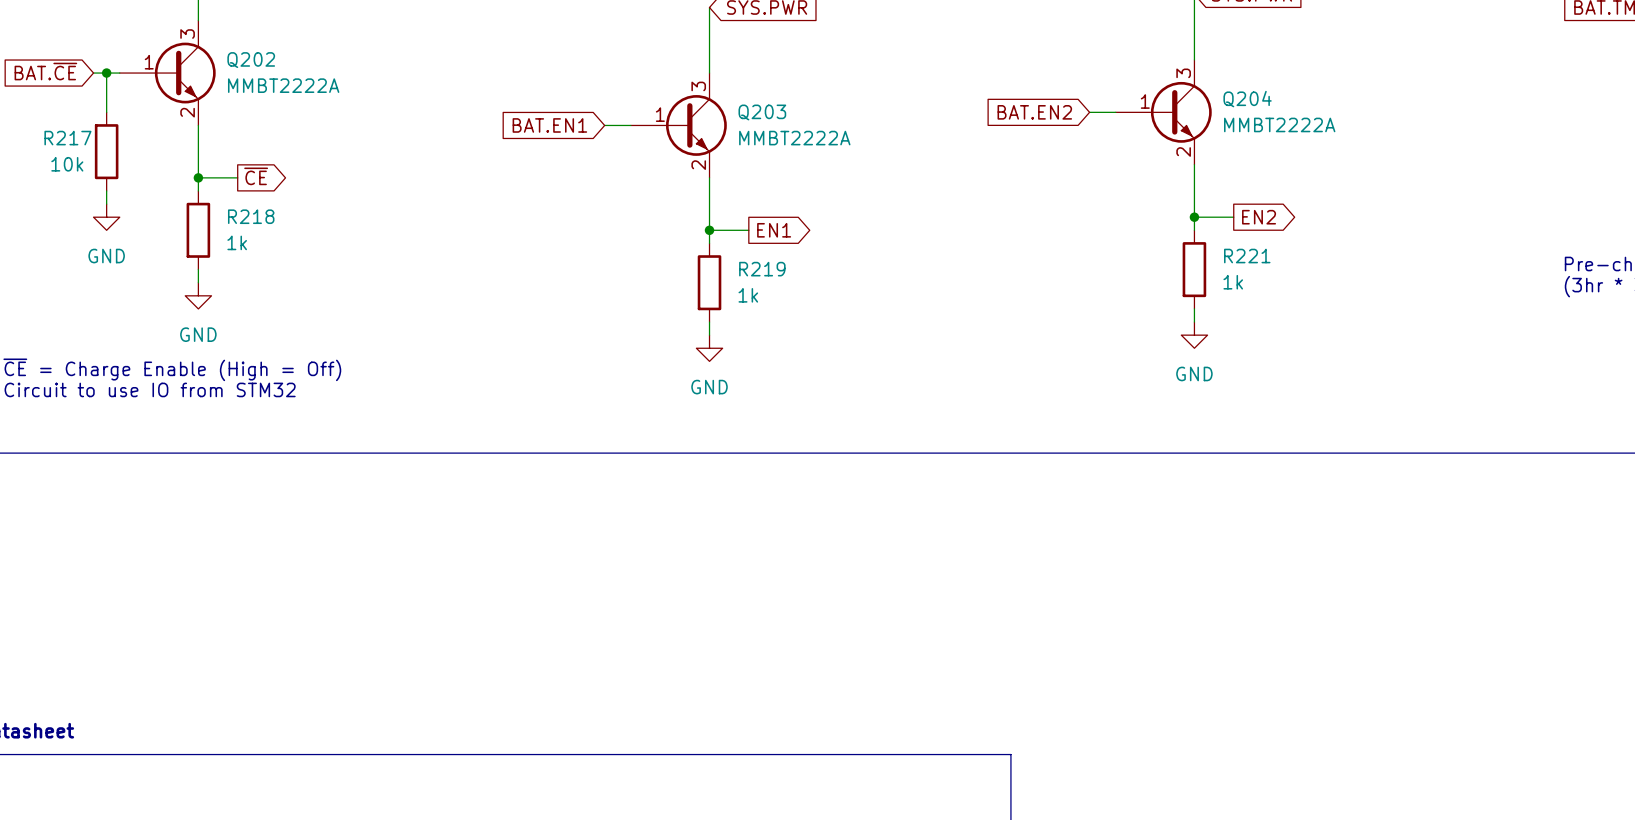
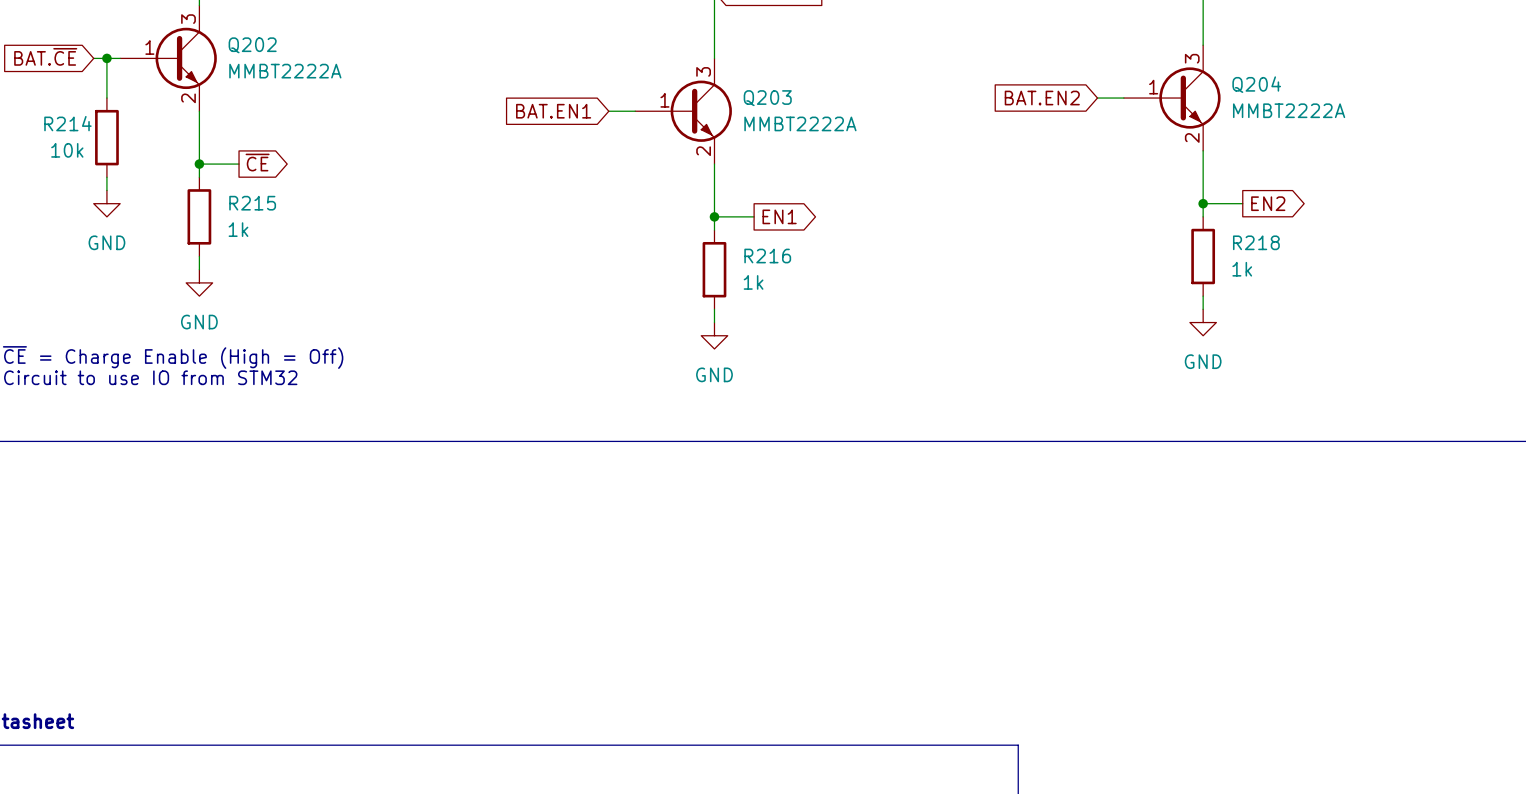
R217 name: R217 (67, 138) -> R214 (67, 123)
R218 name: R218 (251, 216) -> R215 (252, 203)
R221 name: R221 (1247, 256) -> R218 (1256, 242)
R219 name: R219 (762, 269) -> R216 (767, 256)

